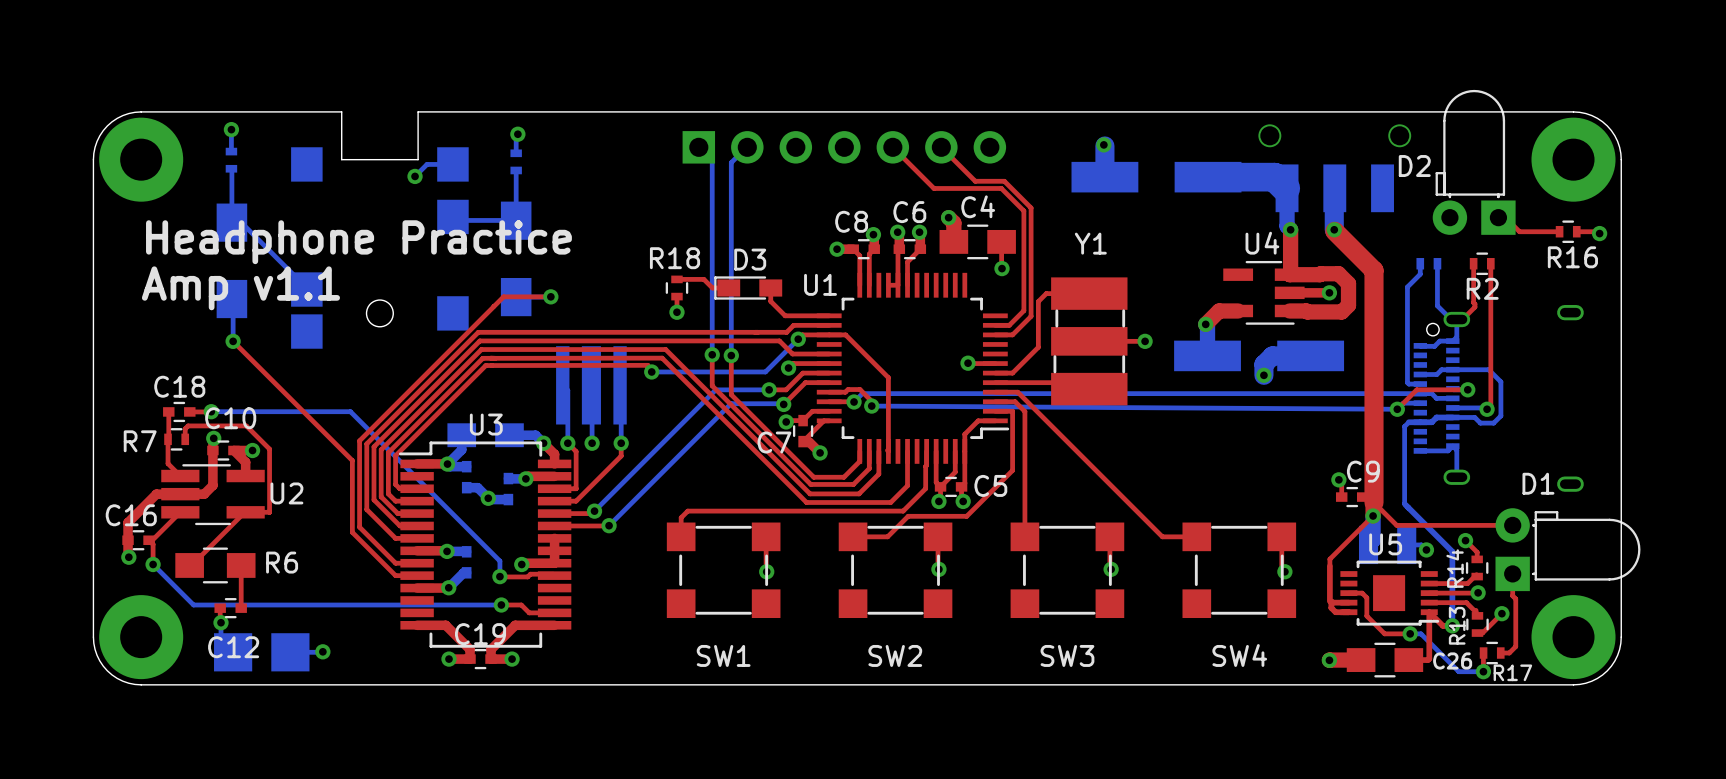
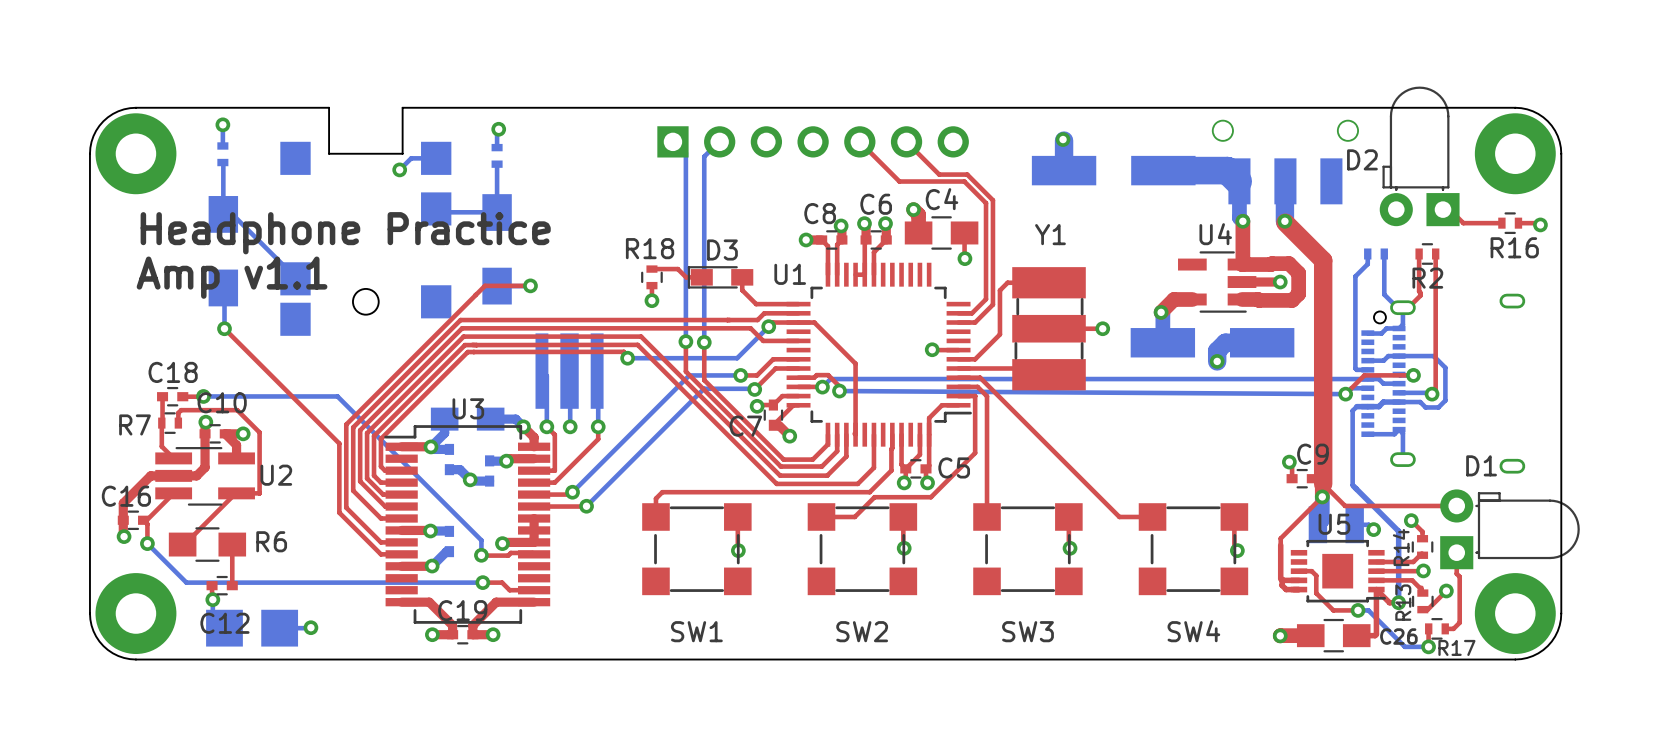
top track: (829, 363) (793, 363) (788, 368) -> none
via: (788, 368) -> none

